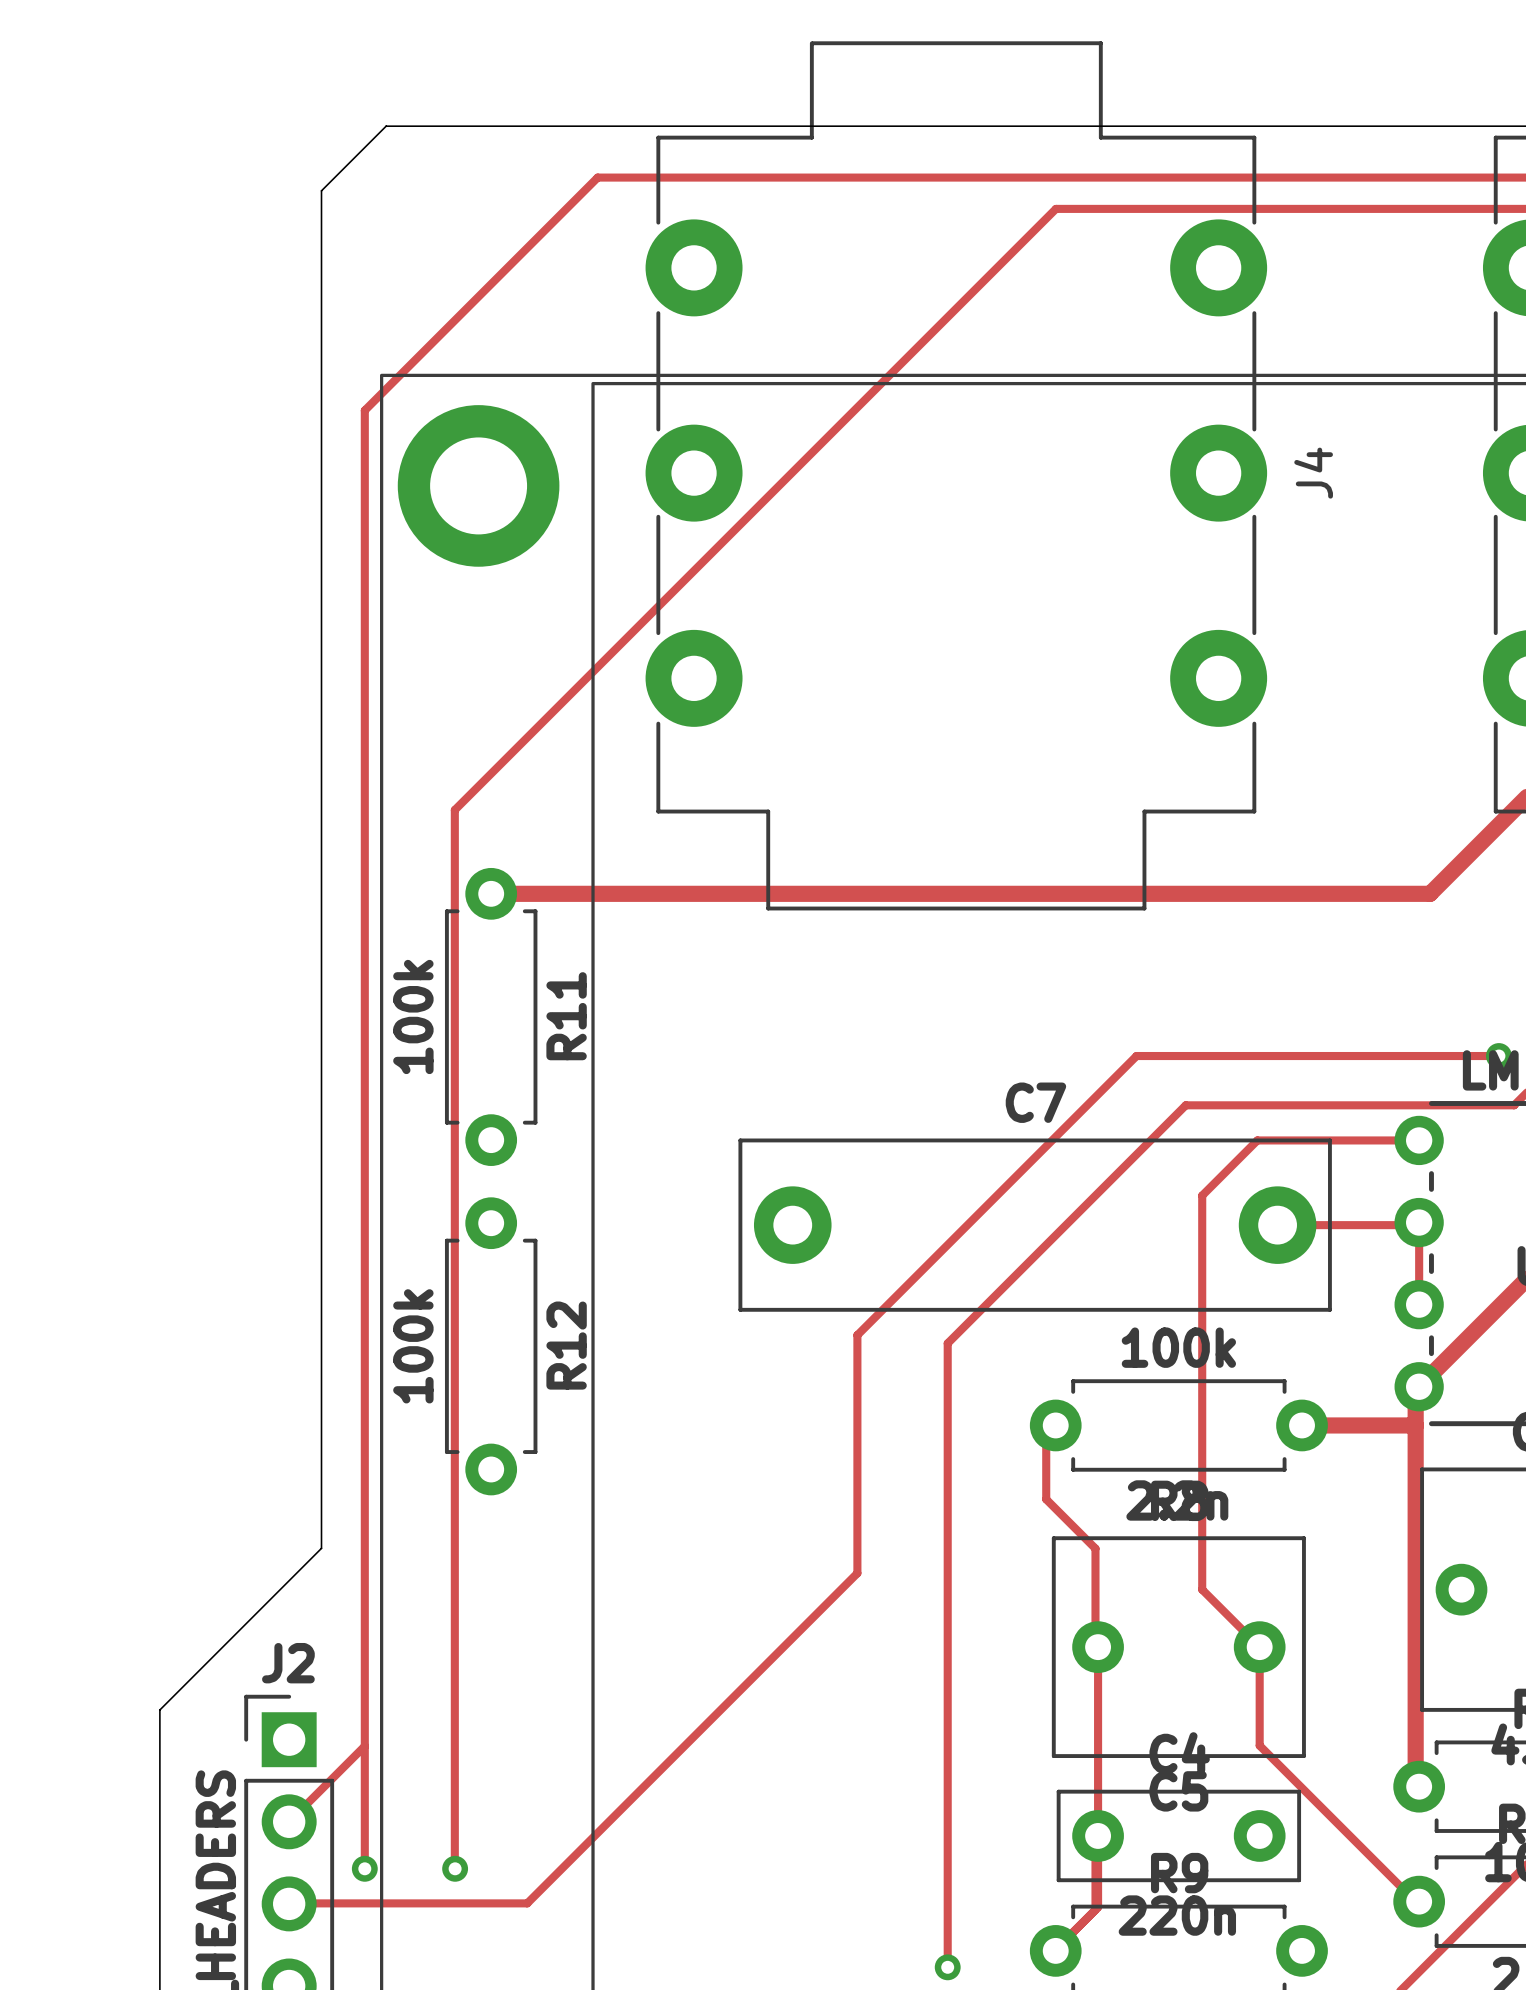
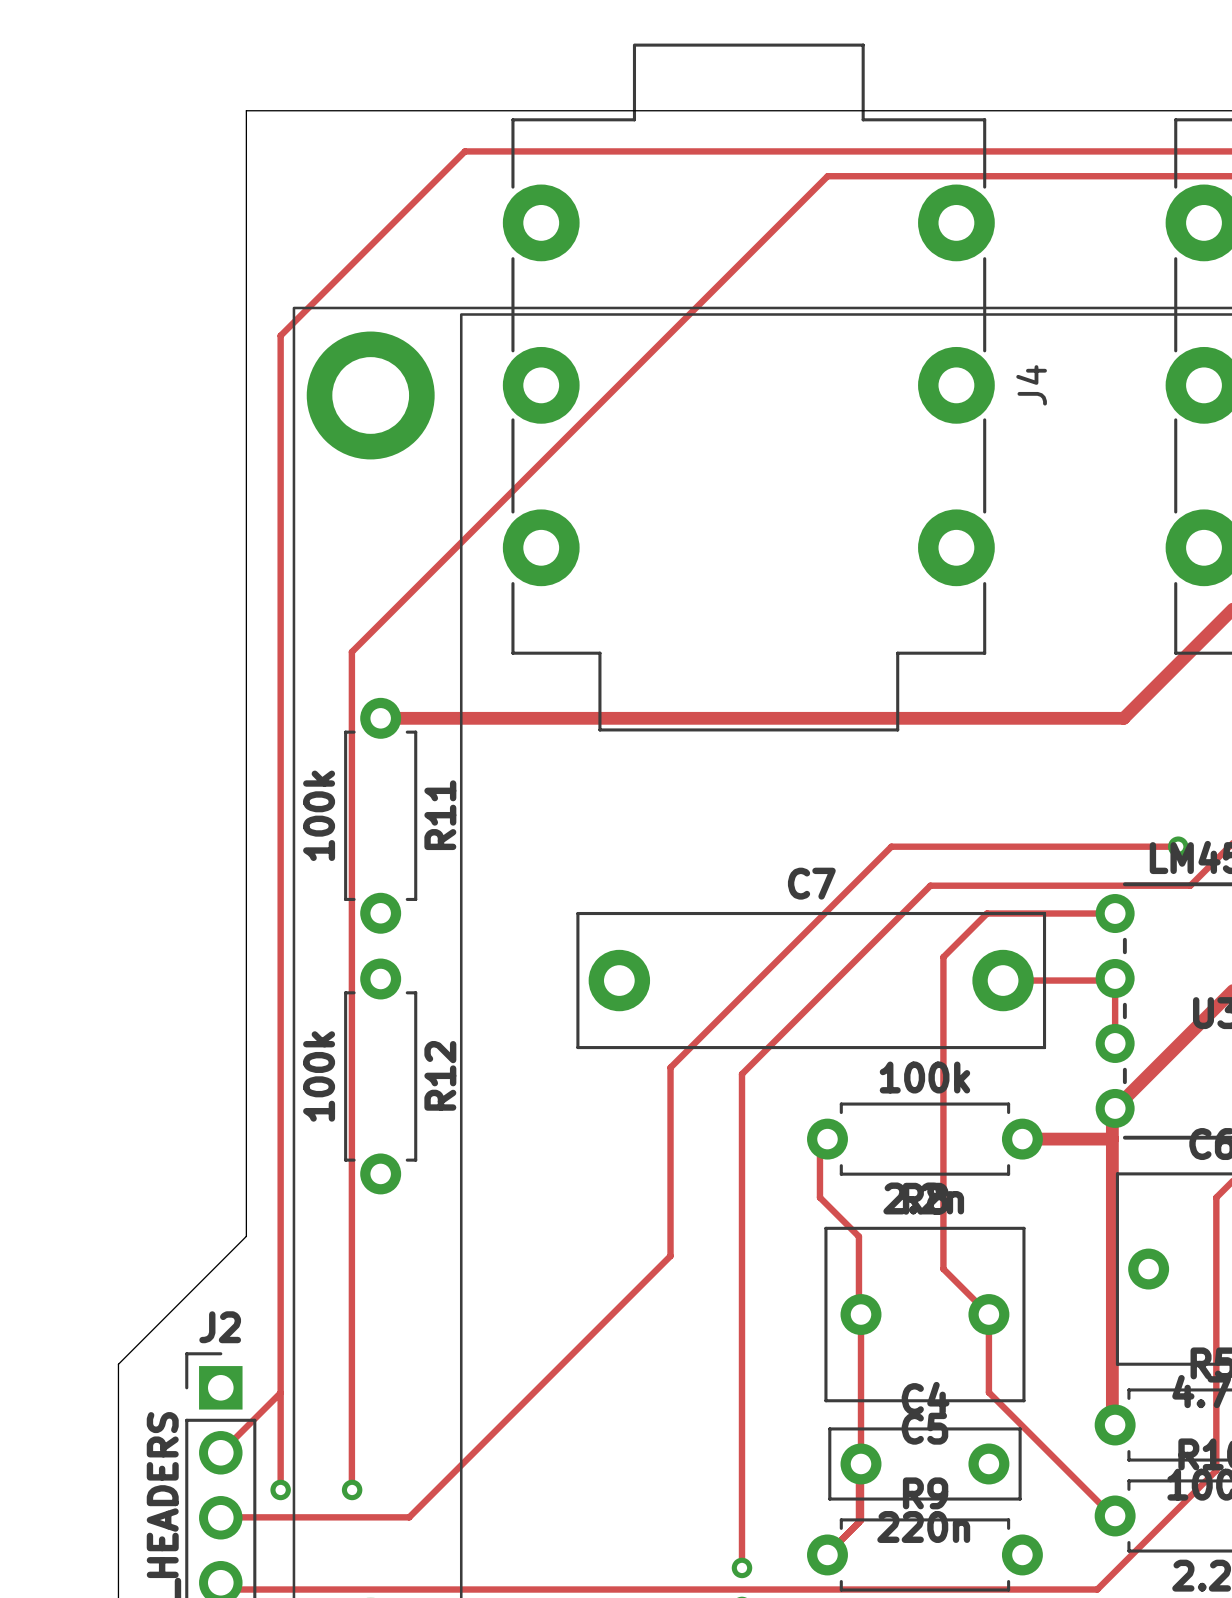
board edge: (386, 126) (321, 190) -> (297, 110) (246, 110) (246, 161)

